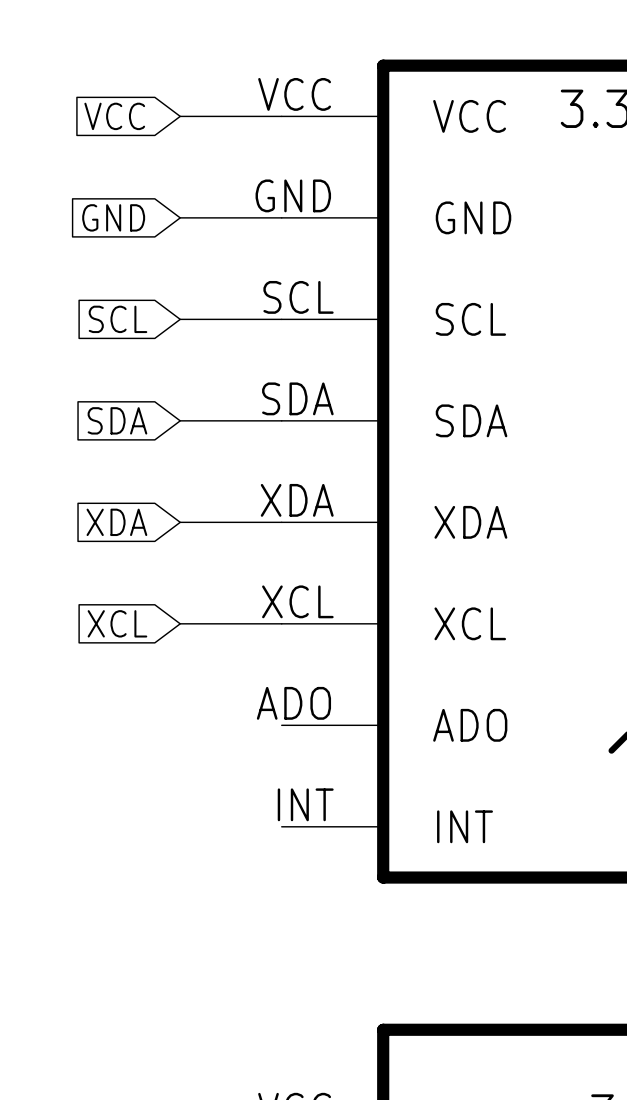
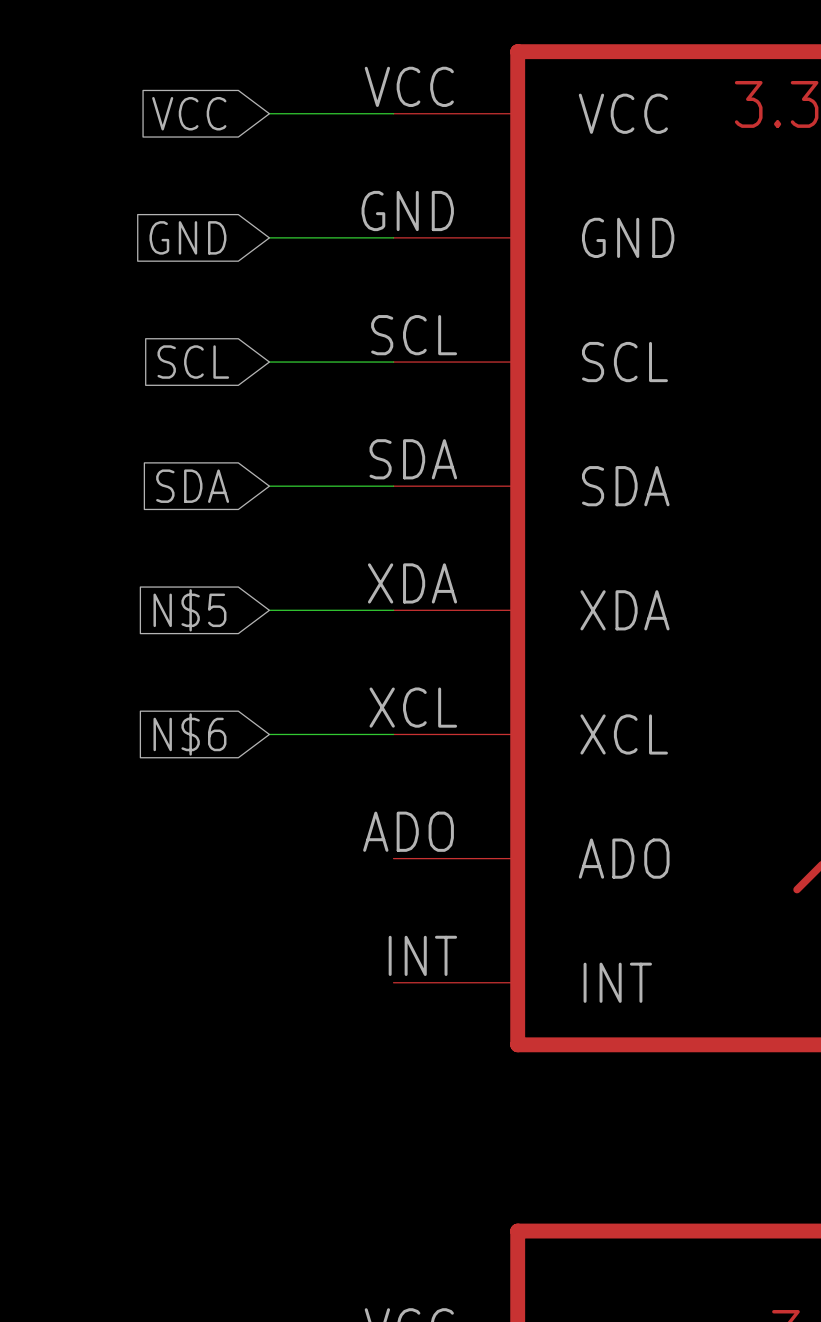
global label: XDA (116, 522) -> N$5 (189, 610)
global label: XCL (117, 623) -> N$6 (189, 734)

